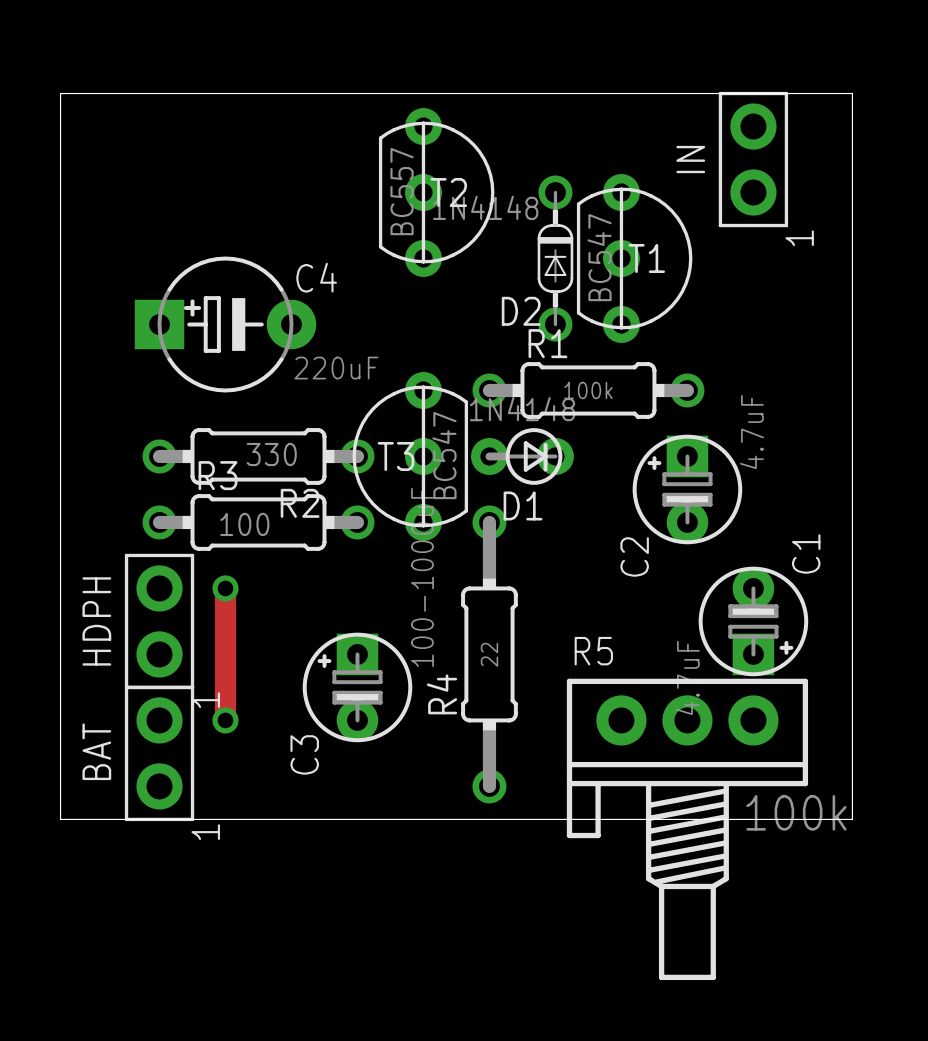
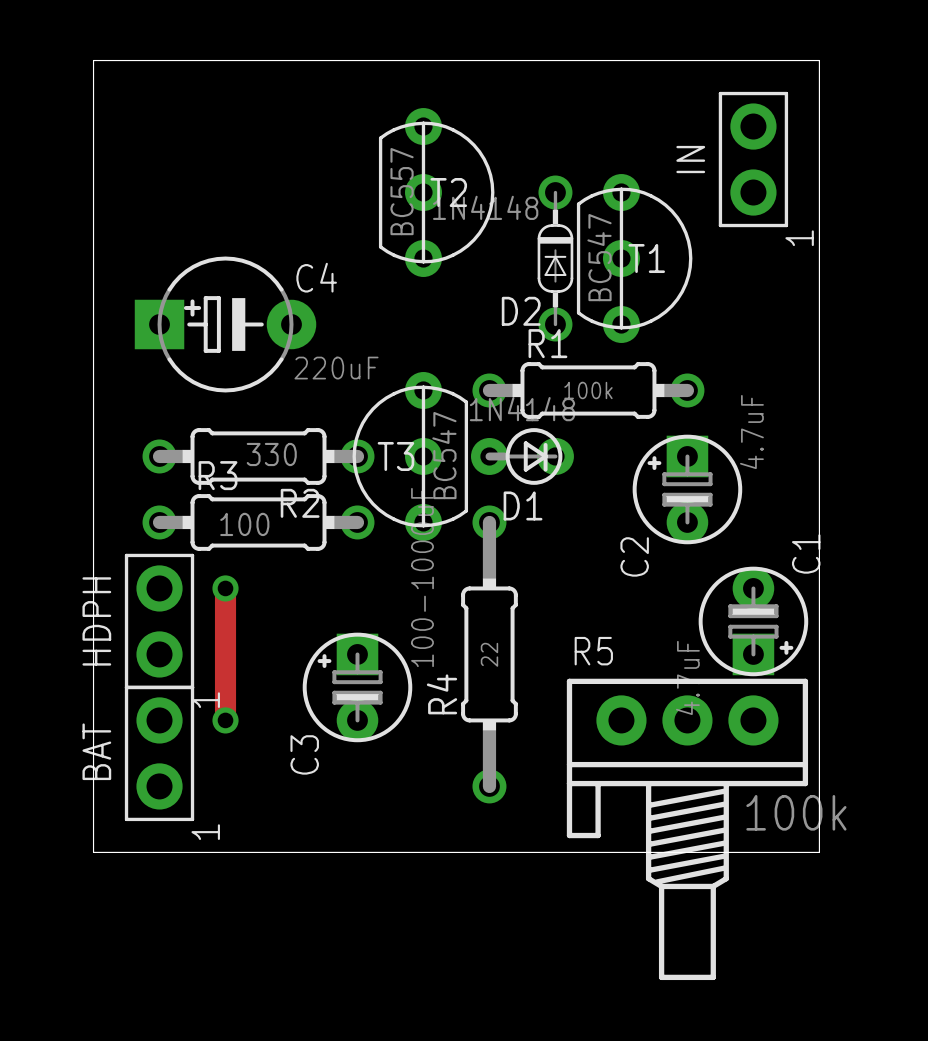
board edge: (60, 93) (852, 93) (852, 819) (60, 819) (60, 93) -> (93, 60) (93, 852) (819, 852) (819, 60) (93, 60)

